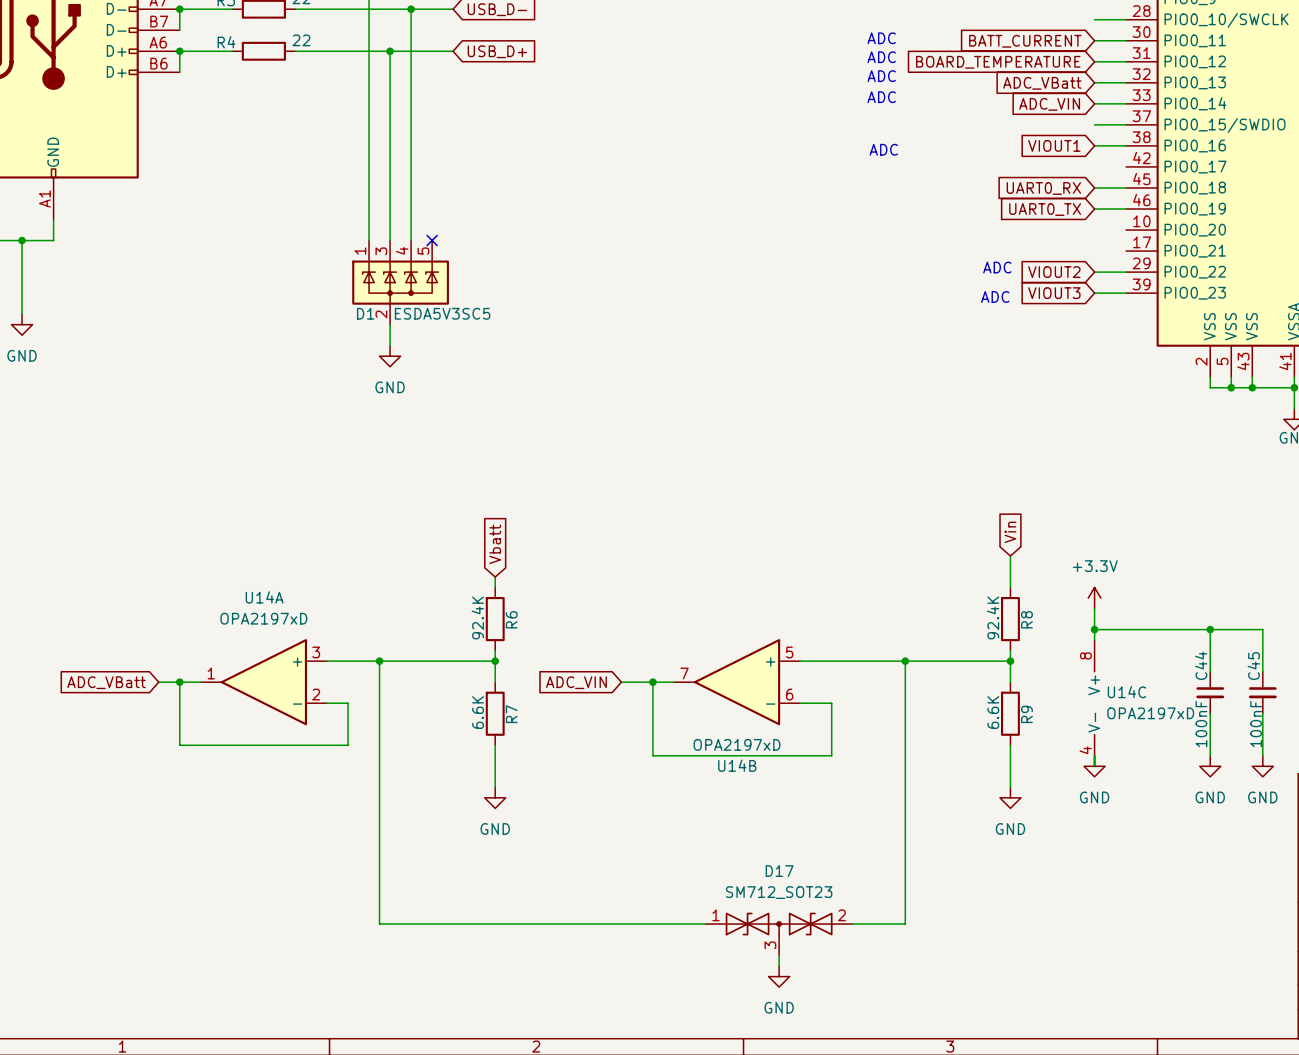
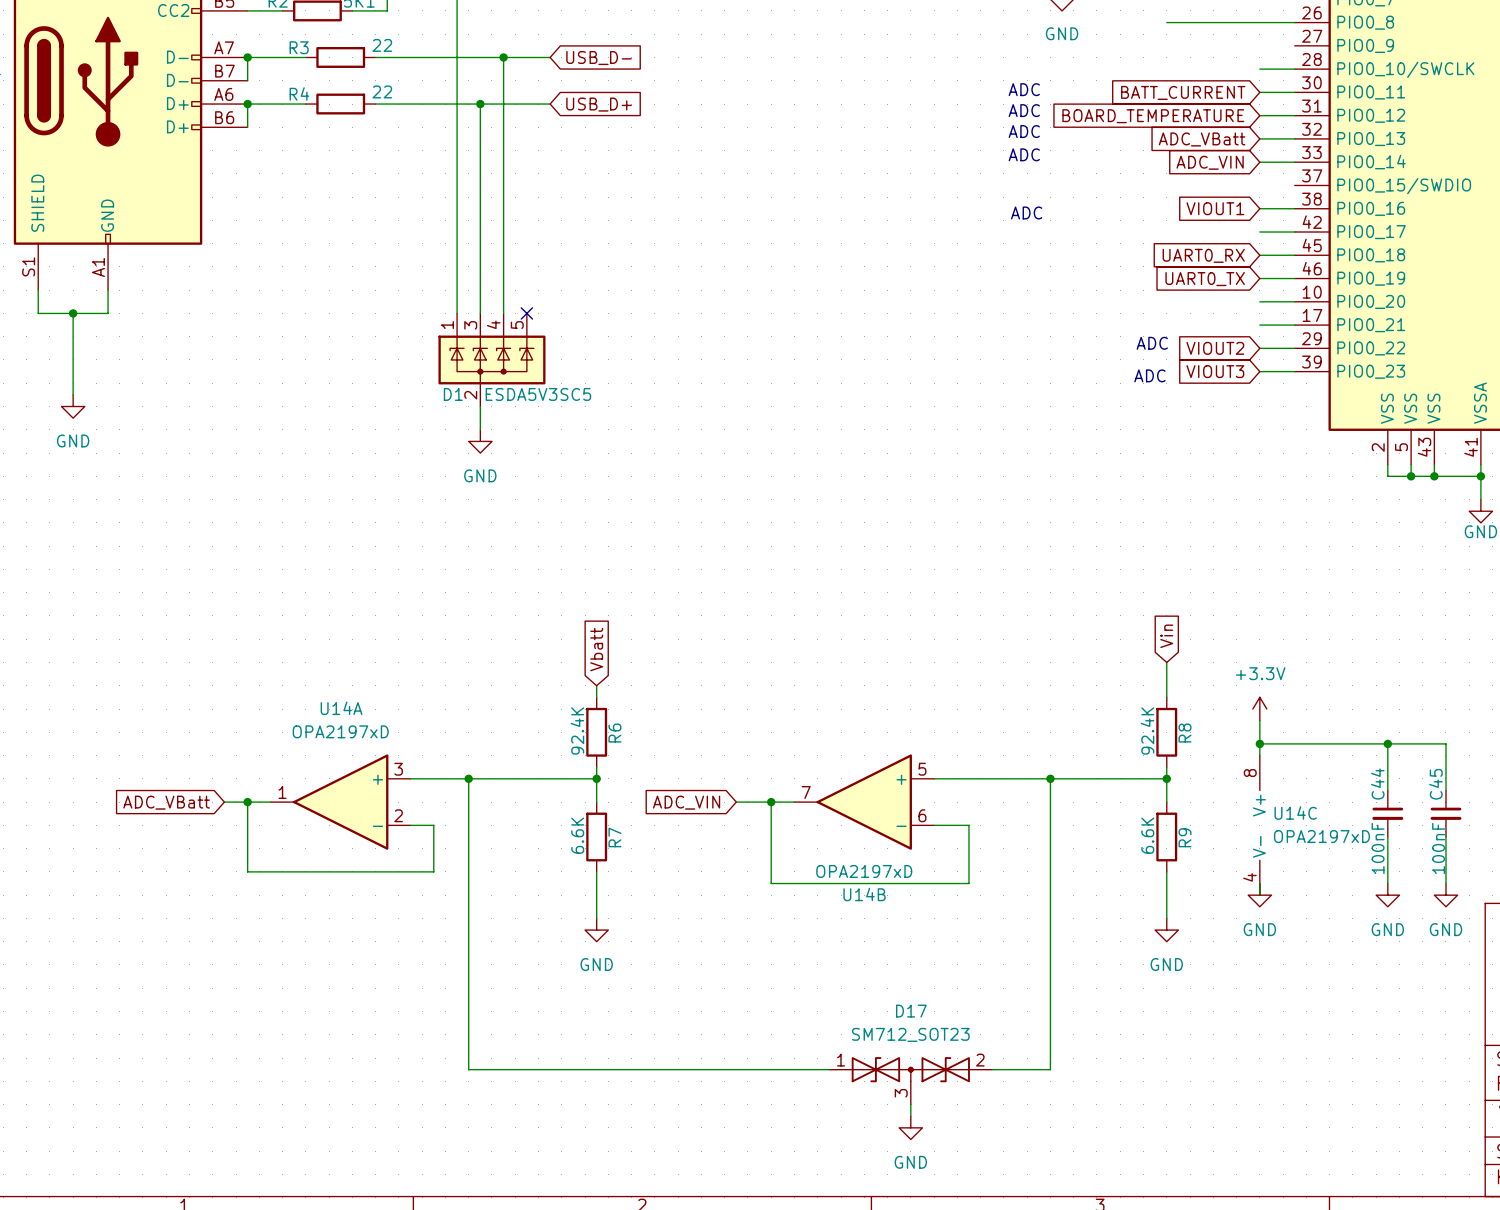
wire: (1094, 124) (1126, 124) -> (1259, 232) (1294, 232)
wire: none -> (1259, 301) (1294, 301)
wire: none -> (1259, 325) (1294, 325)

